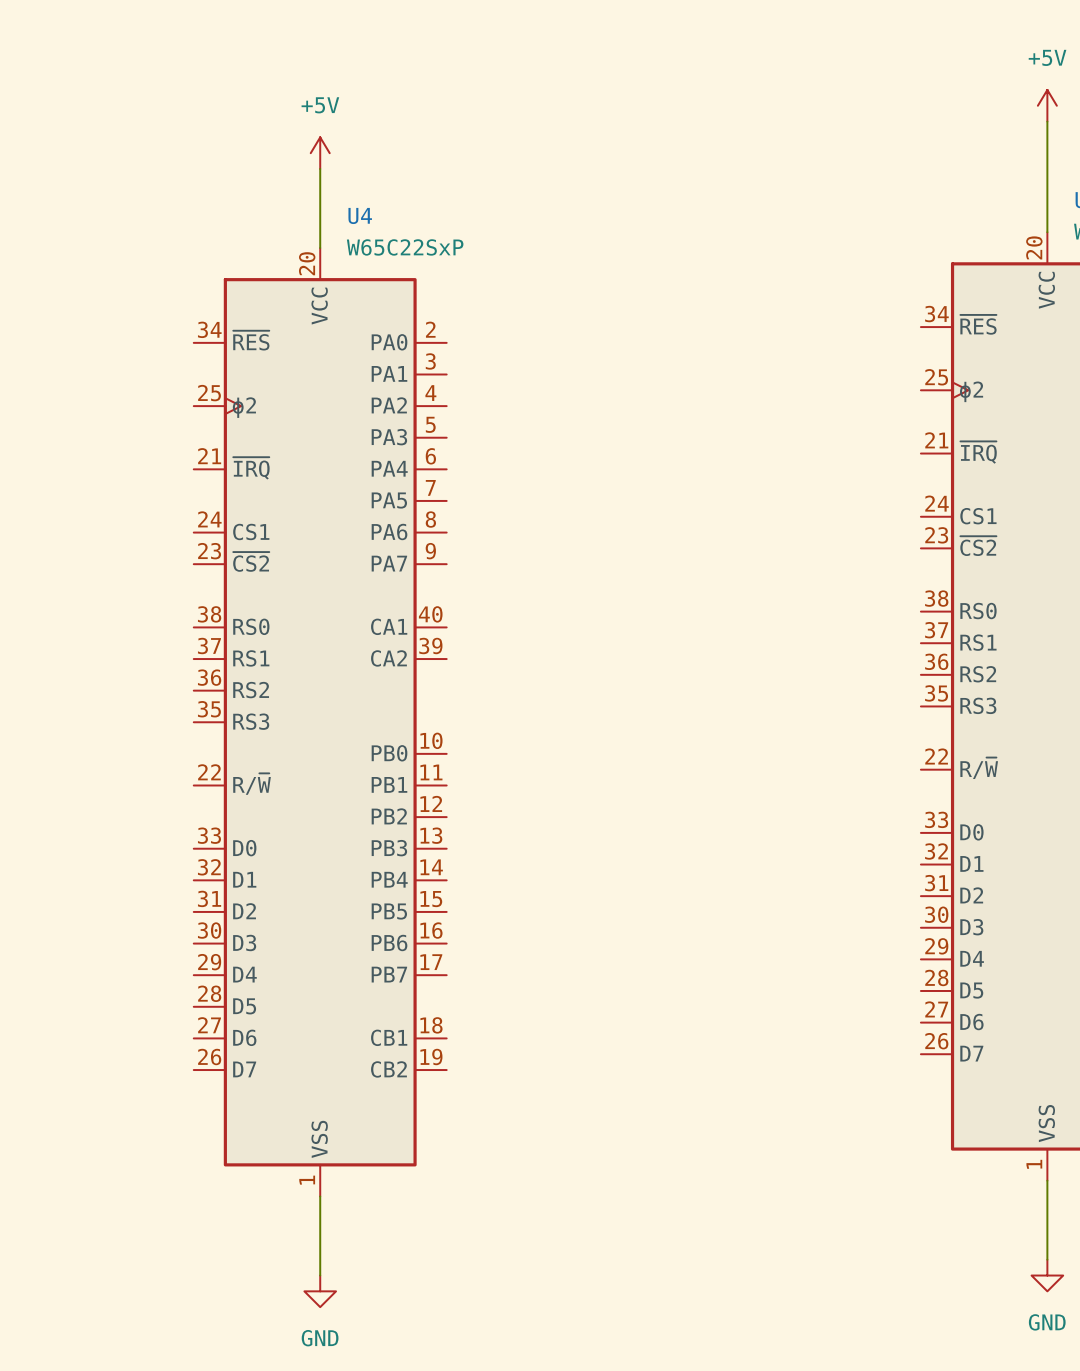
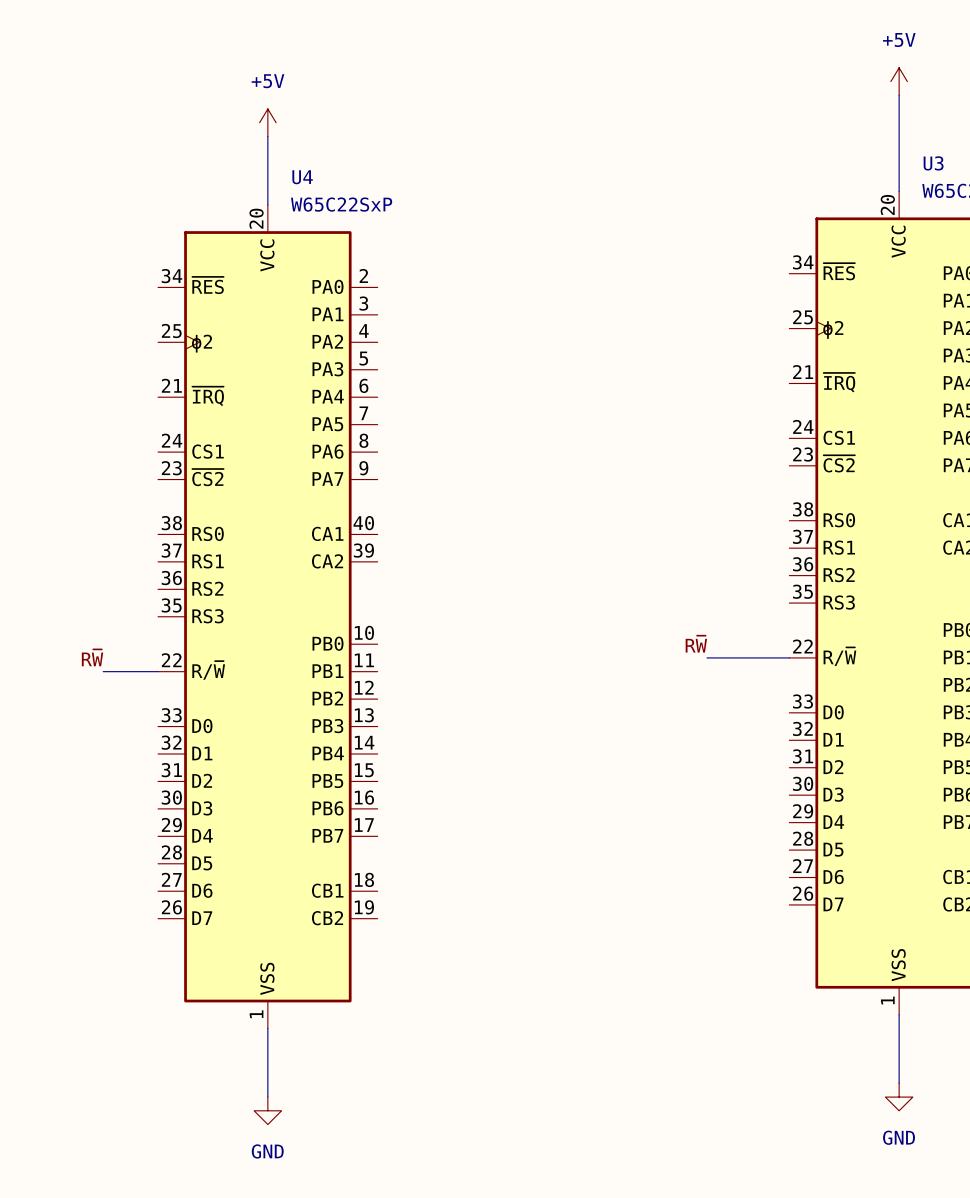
label: none -> R~{W} (696, 644)
label: none -> R~{W} (92, 657)
wire: none -> (707, 657) (789, 657)
wire: none -> (103, 671) (158, 671)

